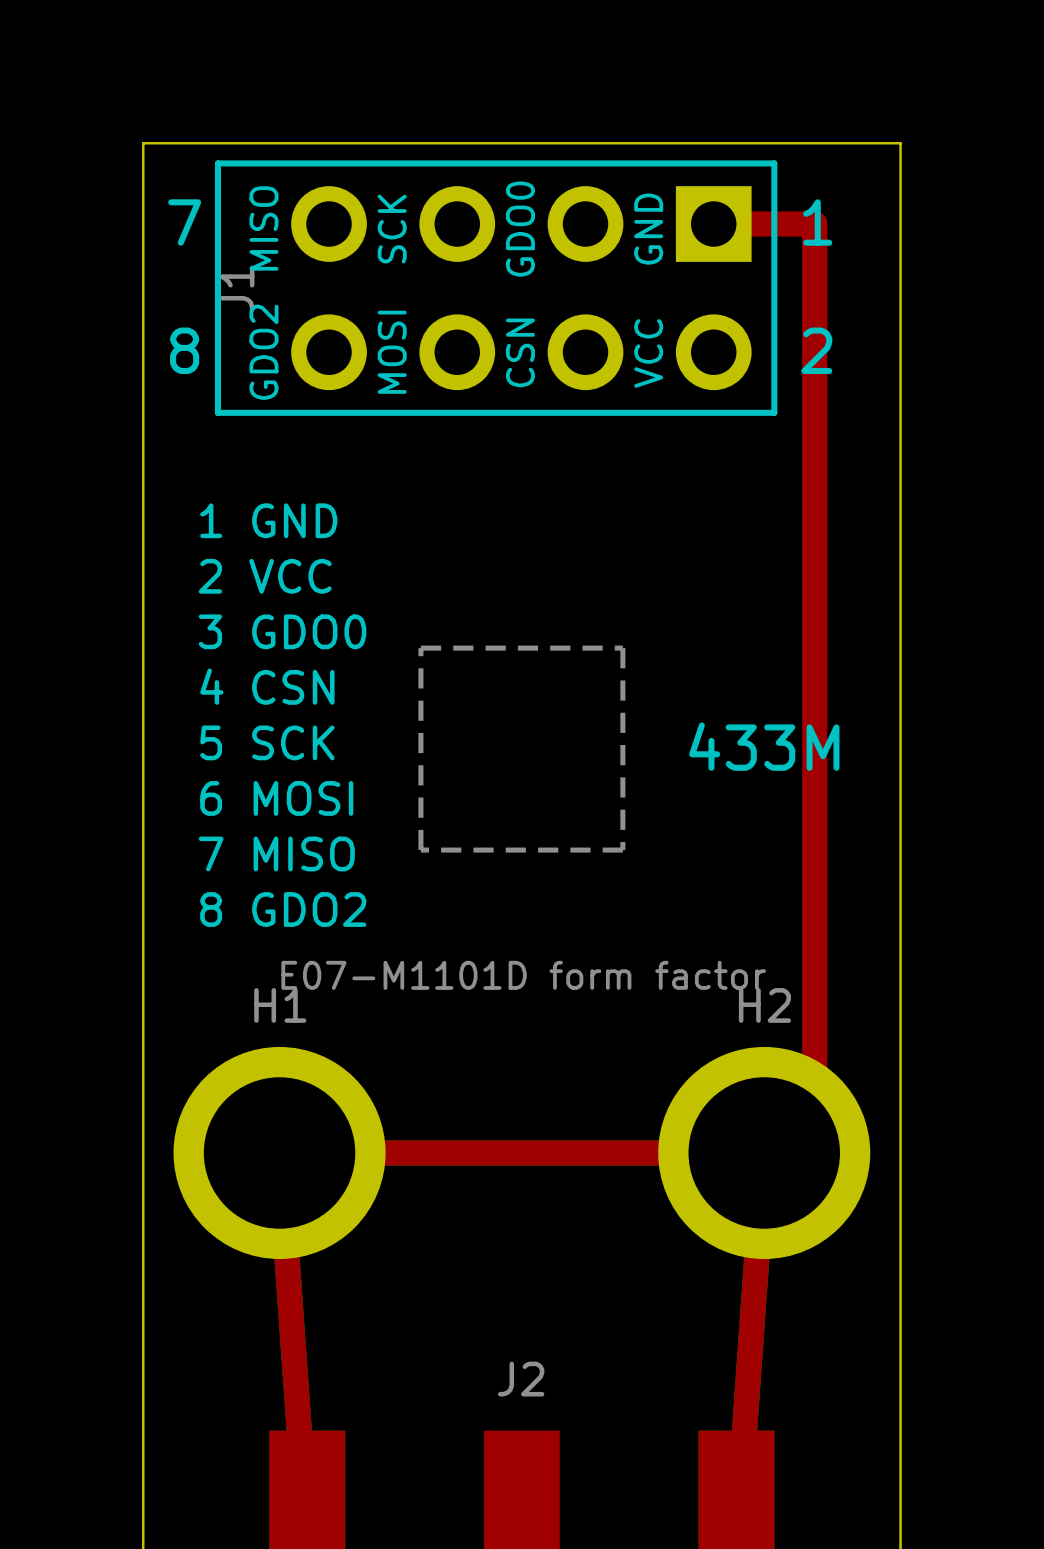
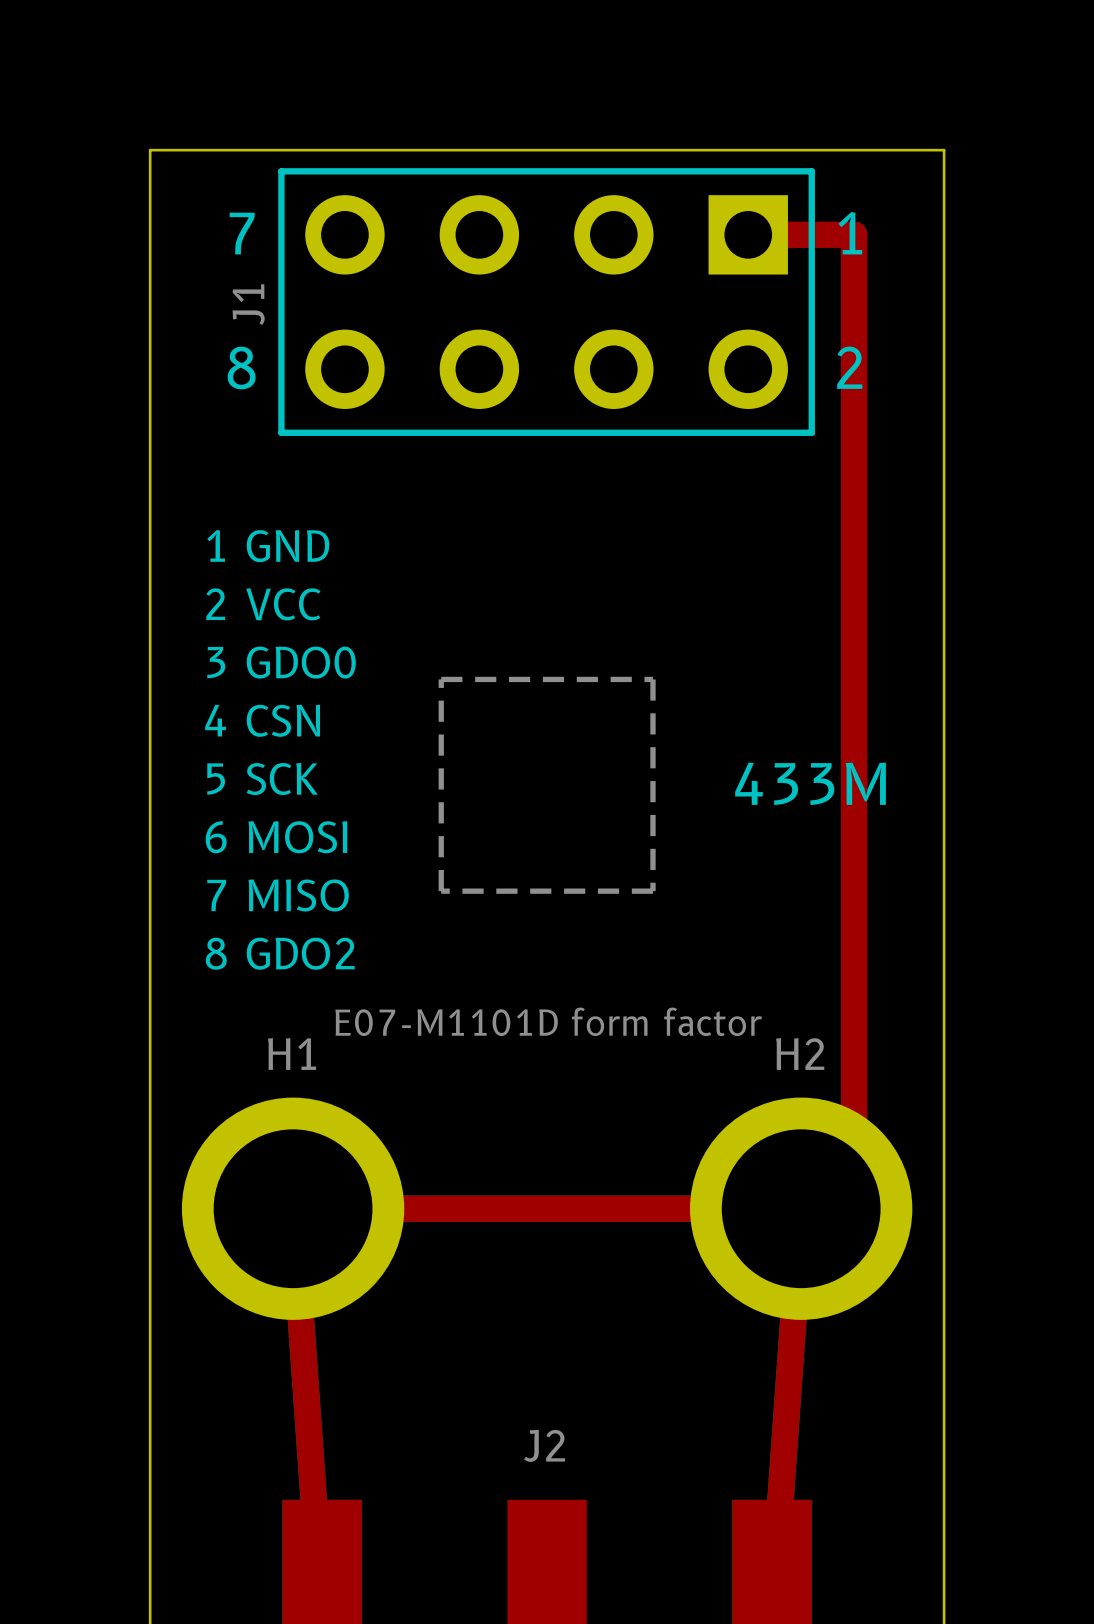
line: (268, 163) (217, 163) (217, 412) (268, 412) -> (281, 171) (281, 432)
text position: 7 (184, 222) -> 7 (242, 233)
text: MISO (263, 228) -> none
text: SCK (392, 229) -> none
text: GDO0 (520, 229) -> none
text: GND (648, 229) -> none
text position: 8 (184, 350) -> 8 (241, 367)
text: GDO2 (263, 352) -> none
text: MOSI (392, 352) -> none
text: CSN (520, 352) -> none
text: VCC (648, 353) -> none

